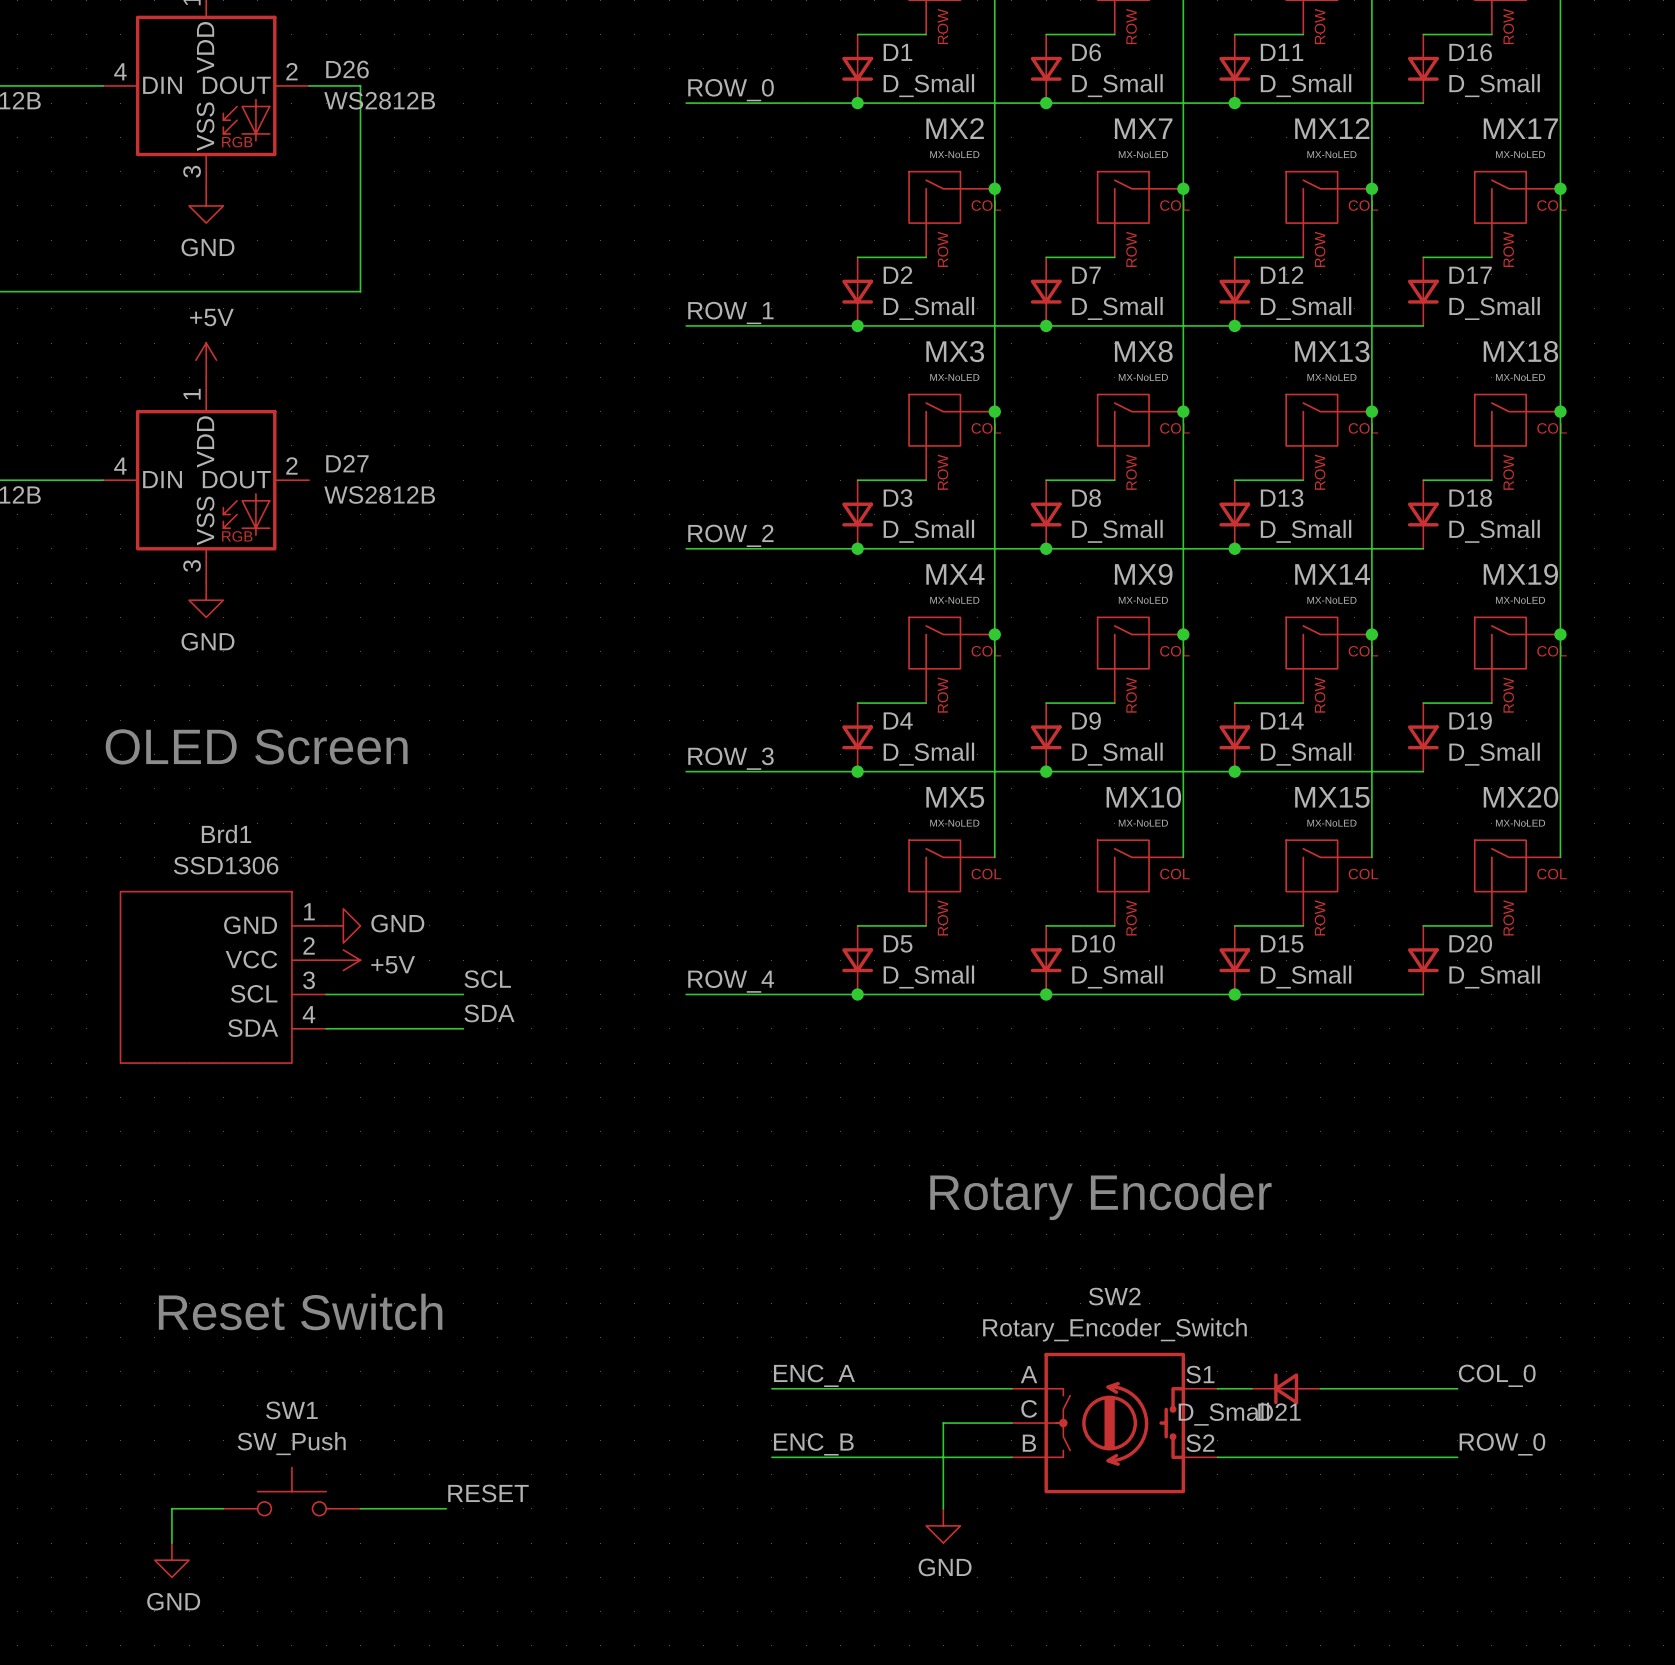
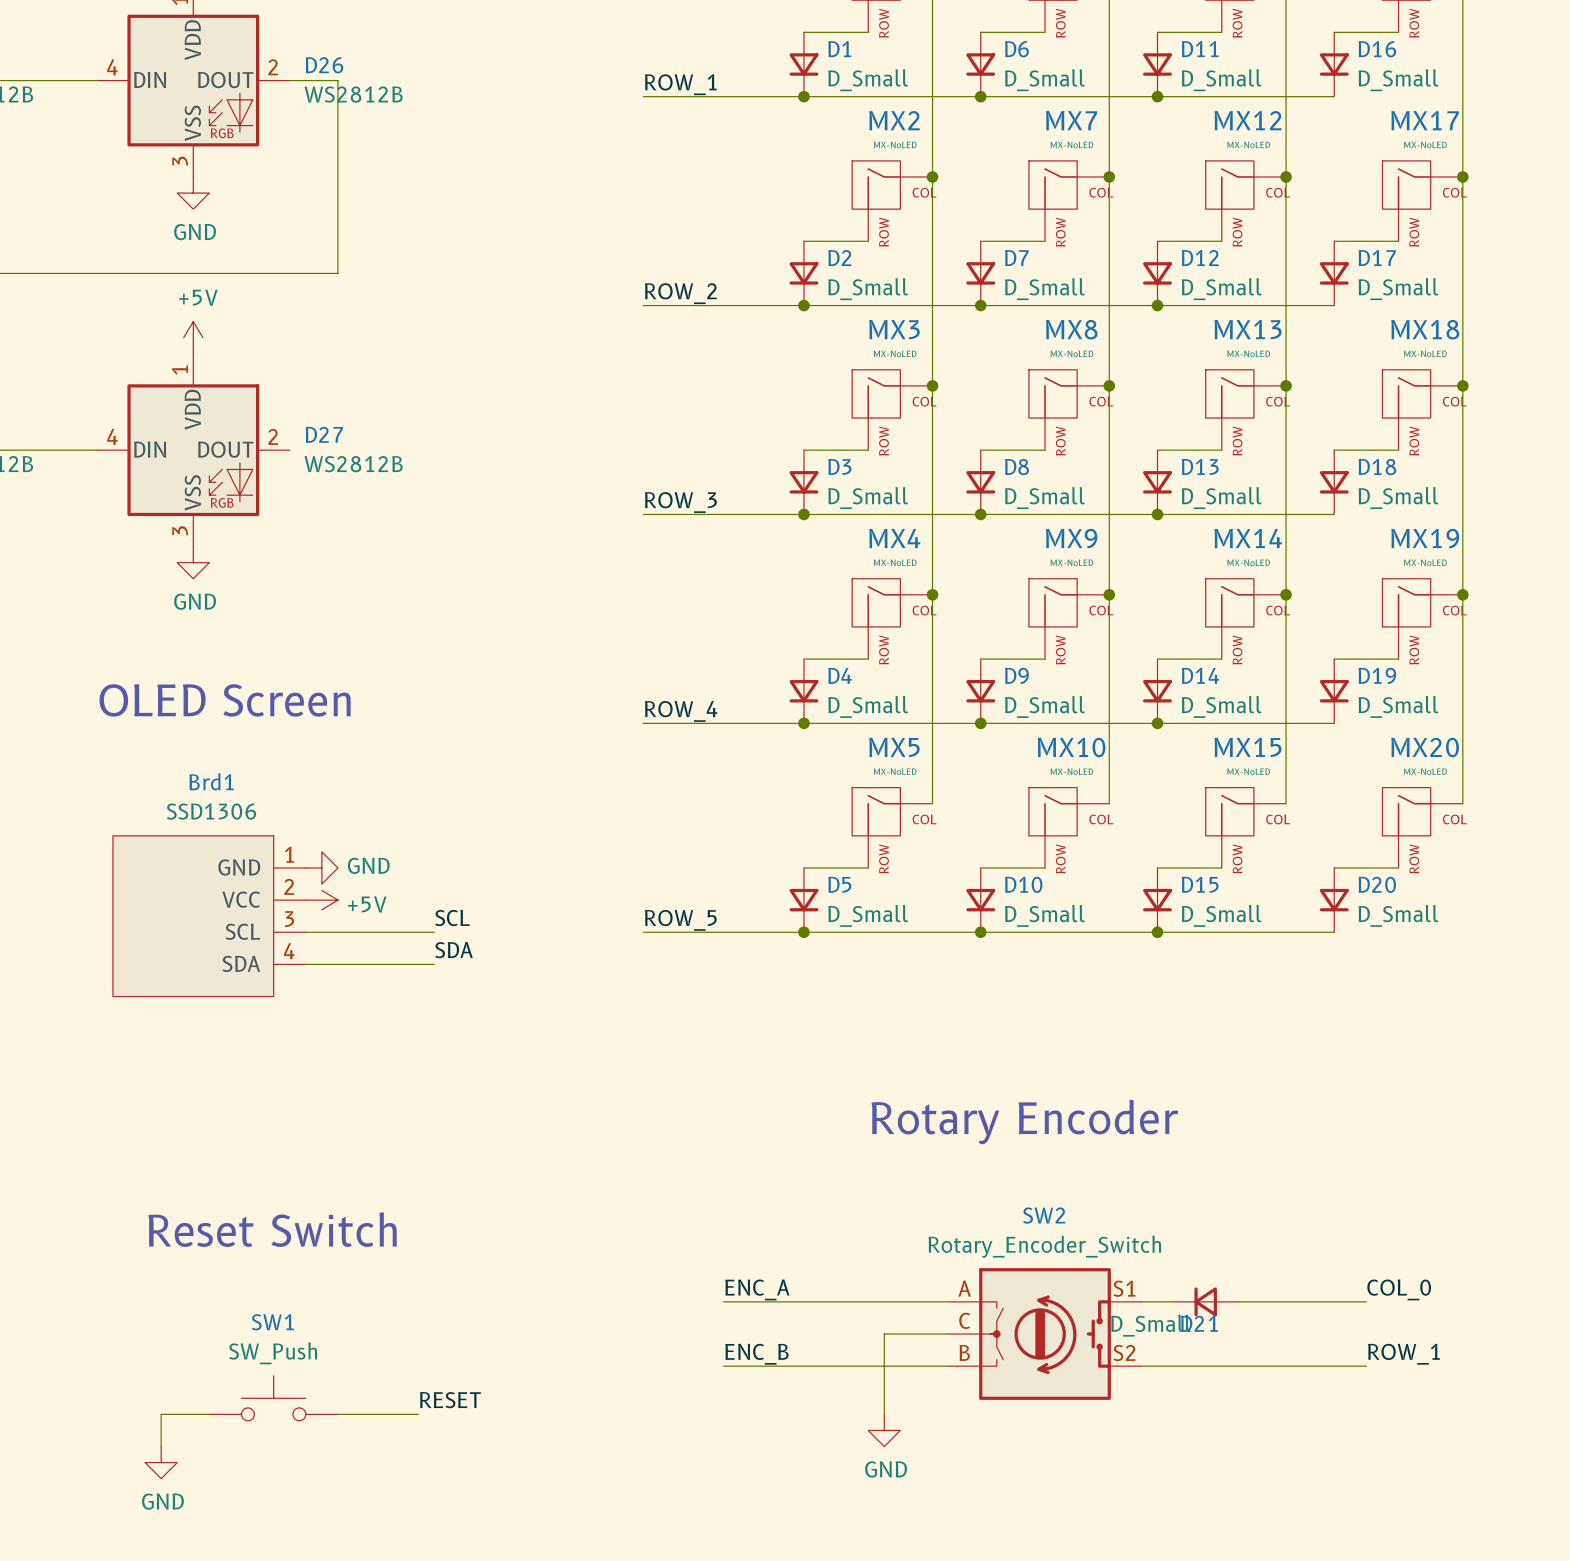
label: ROW_0 (731, 90) -> ROW_1 (680, 84)
label: ROW_1 (730, 312) -> ROW_2 (680, 293)
label: ROW_2 (730, 535) -> ROW_3 (680, 502)
label: ROW_3 (730, 758) -> ROW_4 (681, 711)
label: ROW_4 (731, 981) -> ROW_5 (680, 920)
label: ROW_0 (1502, 1444) -> ROW_1 (1403, 1354)

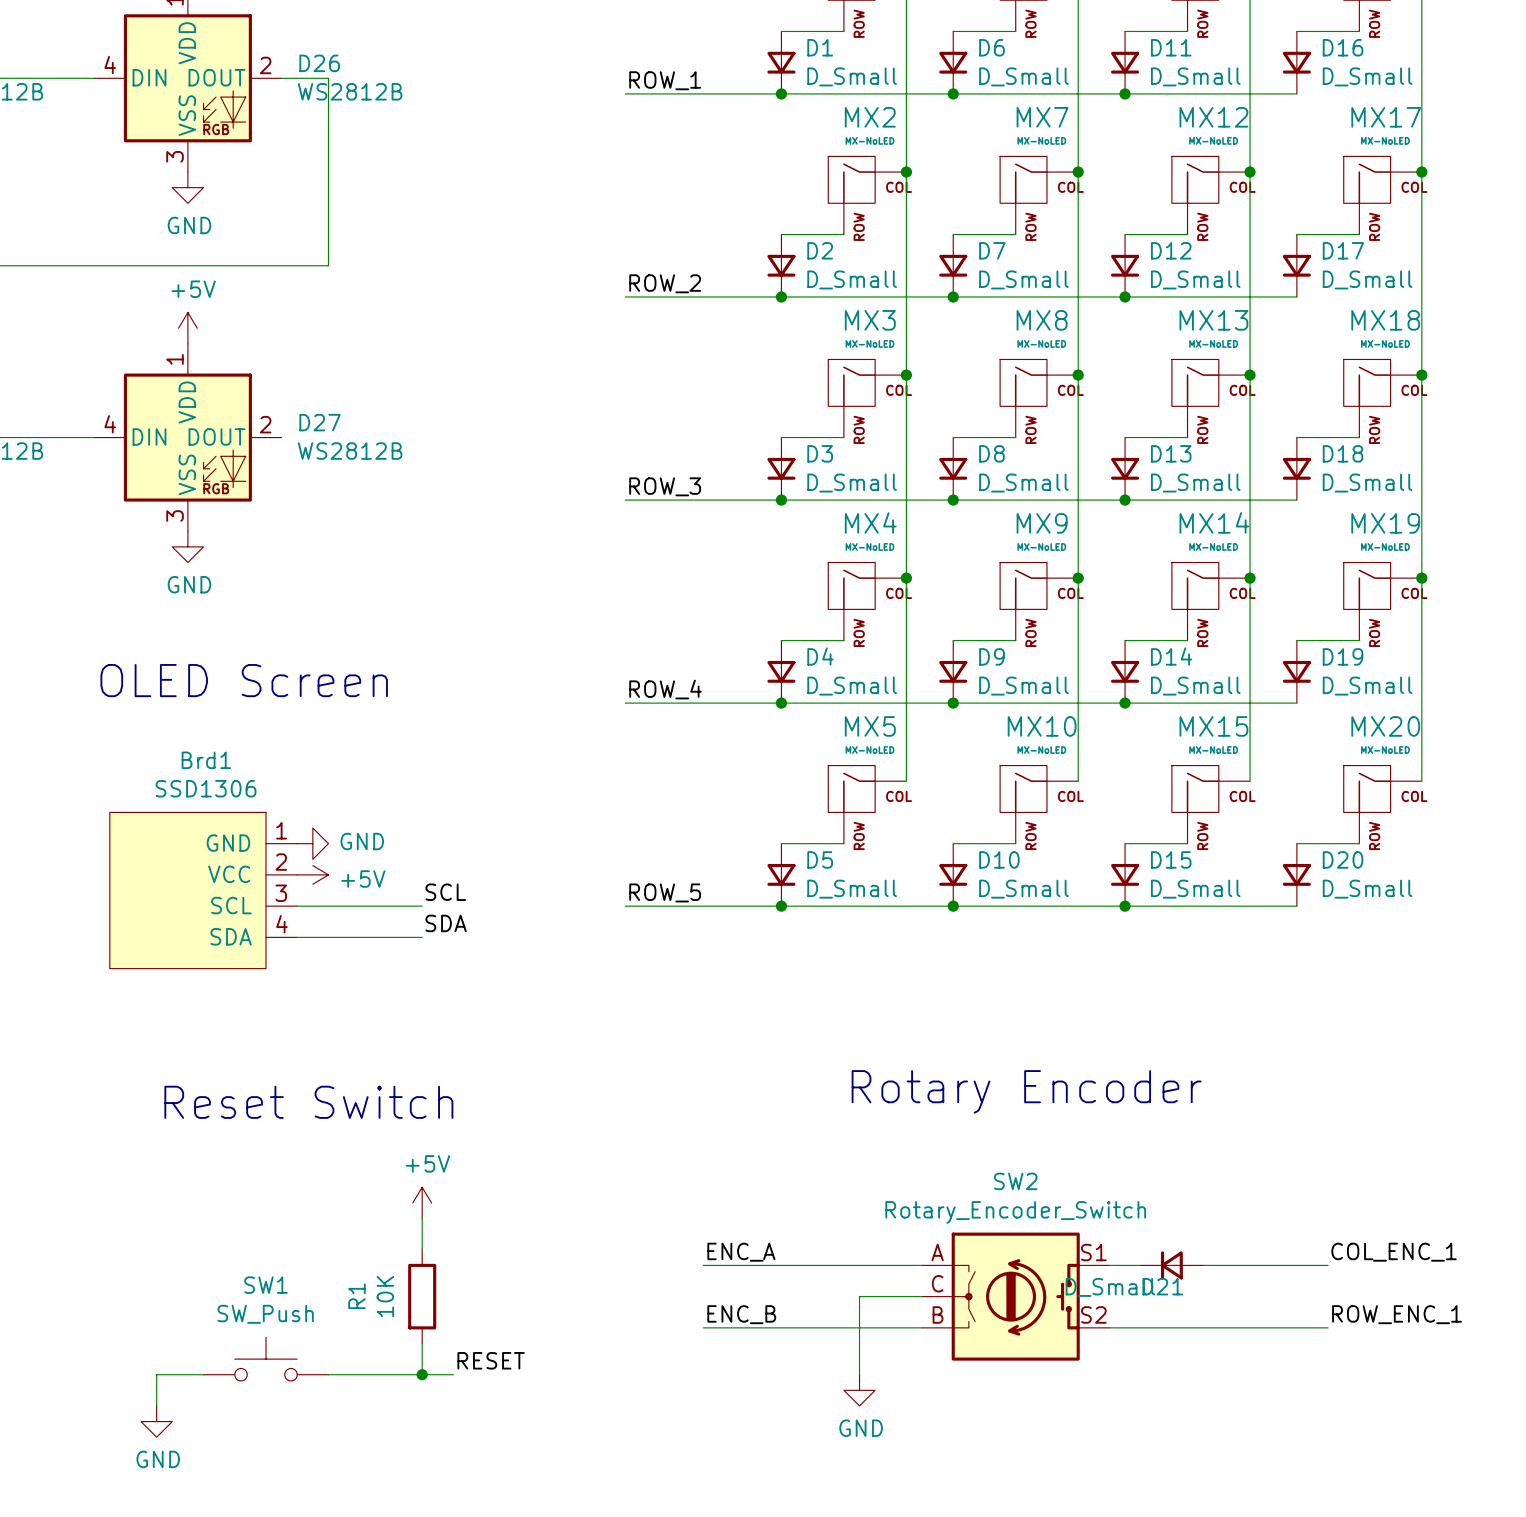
text position: Reset Switch (272, 1229) -> Reset Switch (308, 1102)
power symbol: none -> +5V (422, 1202)
wire: none -> (422, 1218) (422, 1249)
label: COL_0 (1399, 1289) -> COL_ENC_1 (1394, 1252)
R1: none -> 10K (422, 1296)
label: ROW_1 (1403, 1354) -> ROW_ENC_1 (1397, 1314)
wire: none -> (422, 1343) (422, 1374)
label position: RESET (450, 1400) -> RESET (491, 1360)
wire: none -> (406, 1374) (453, 1374)
junction: none -> (422, 1374)

